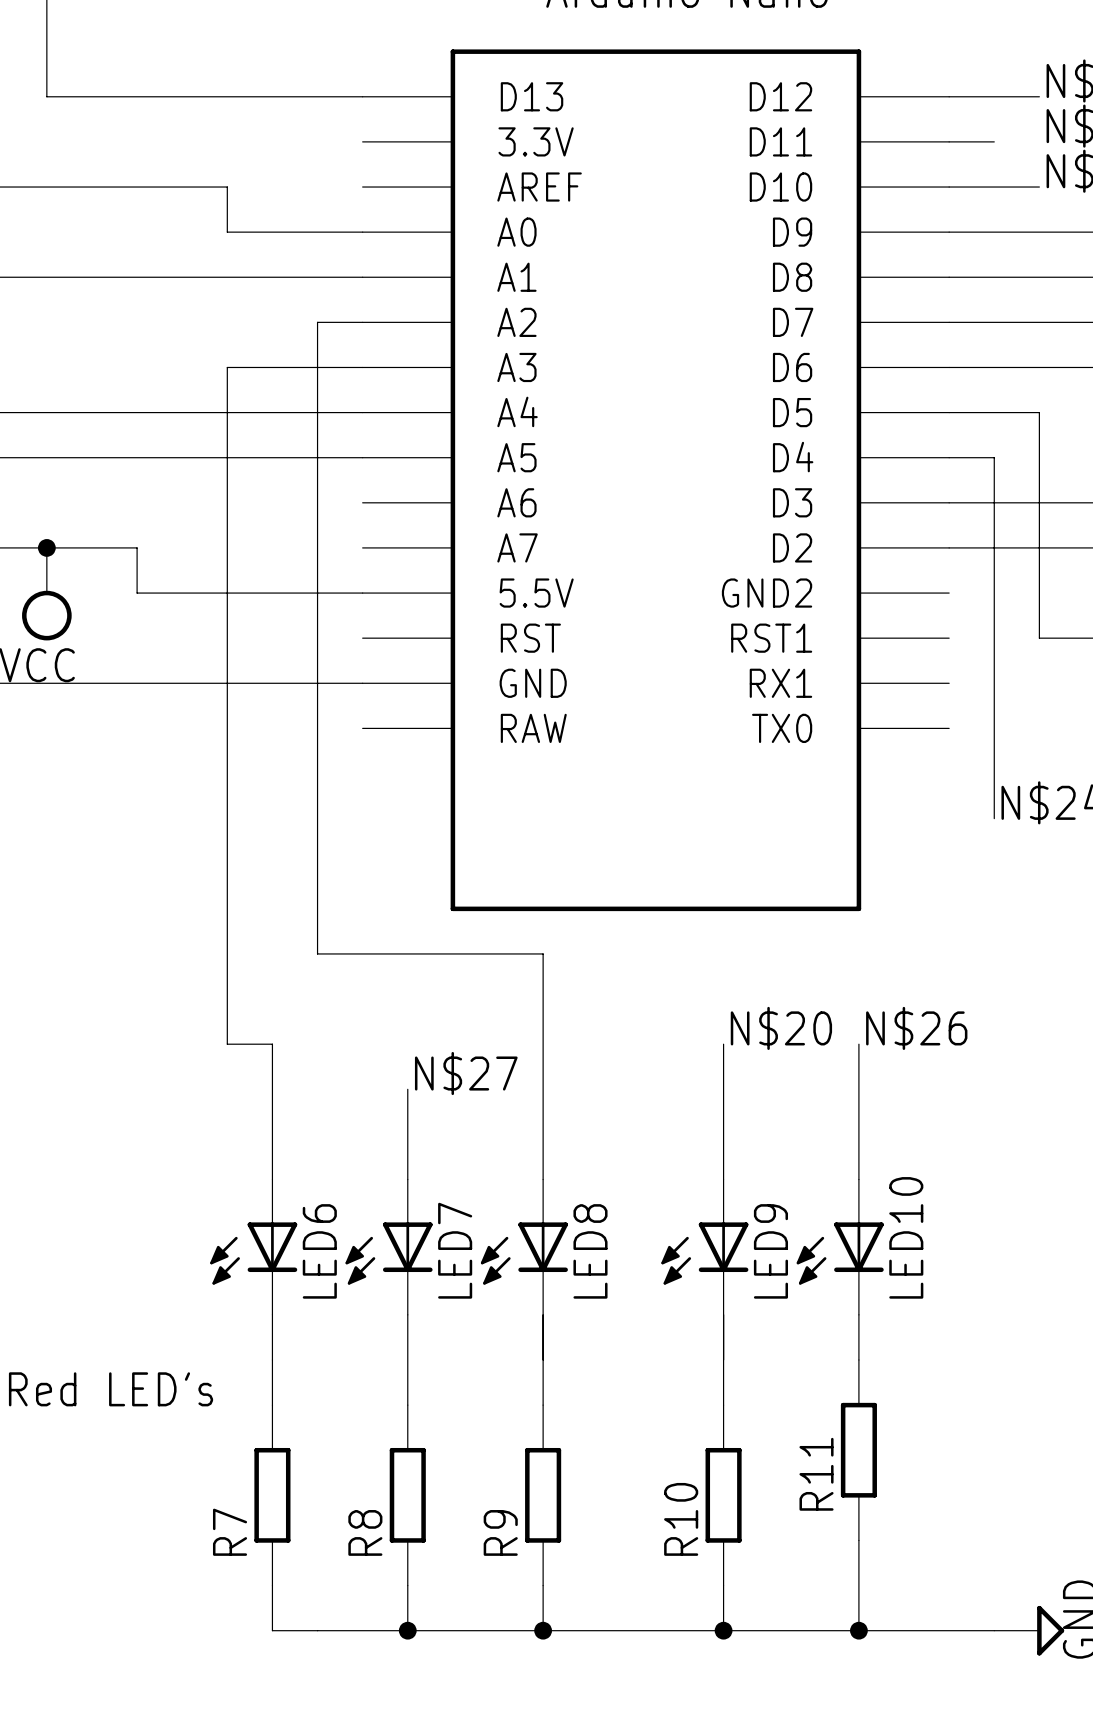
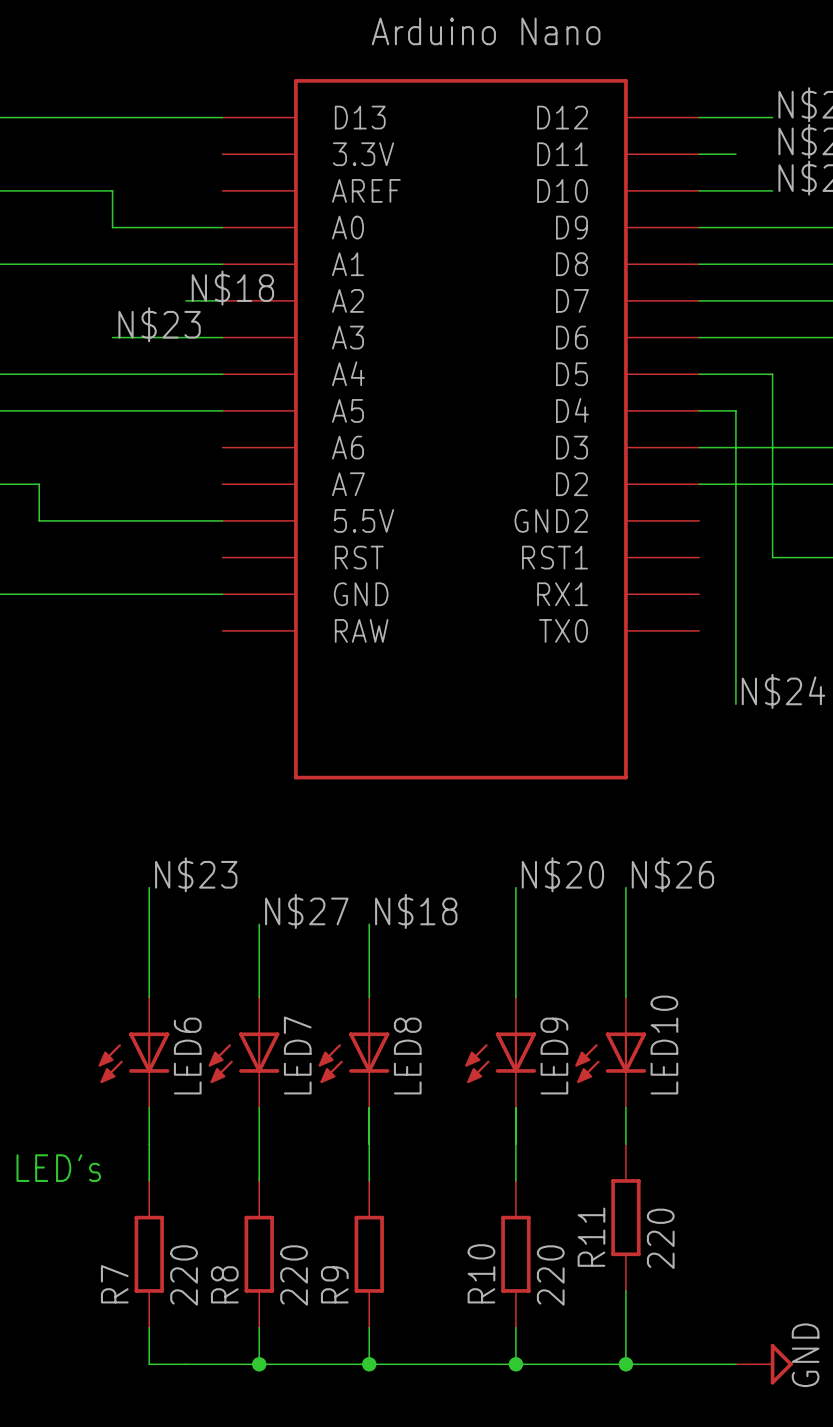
label: none -> N$18 (232, 288)
wire: (317, 322) (317, 953) (543, 953) (543, 1089) -> none
label: none -> N$23 (159, 324)
wire: (227, 367) (227, 1044) (272, 1044) -> none
label: none -> N$23 (196, 874)
label: none -> N$18 (416, 911)
R11 value: none -> 220 (660, 1238)
R7 value: none -> 220 (184, 1275)
R8 value: none -> 220 (294, 1275)
R10 value: none -> 220 (550, 1275)

